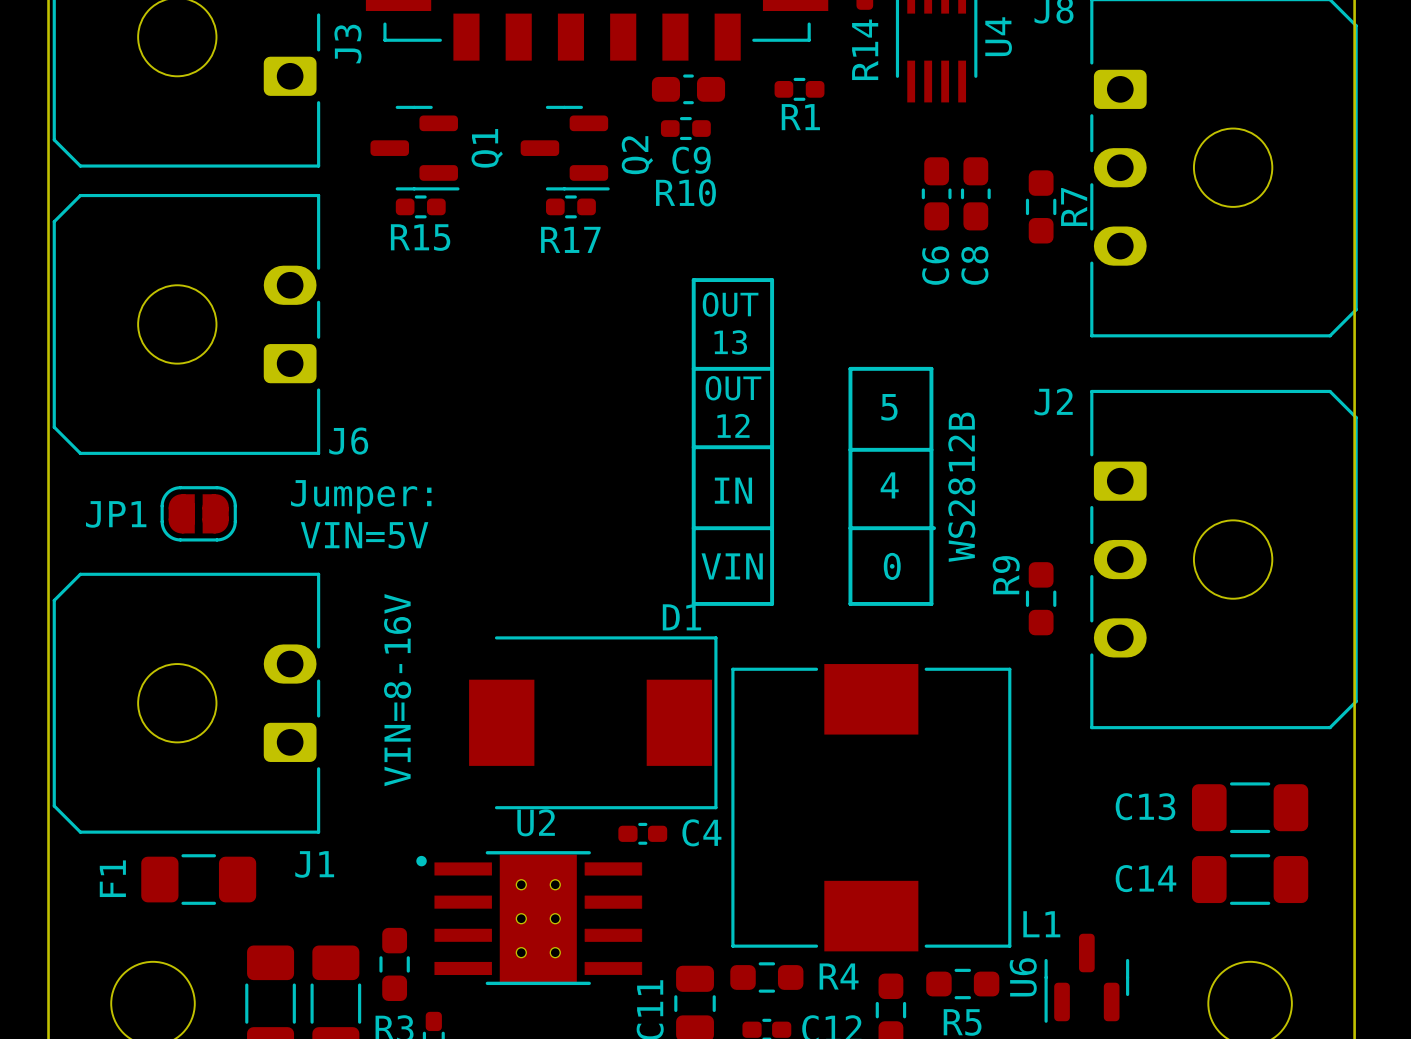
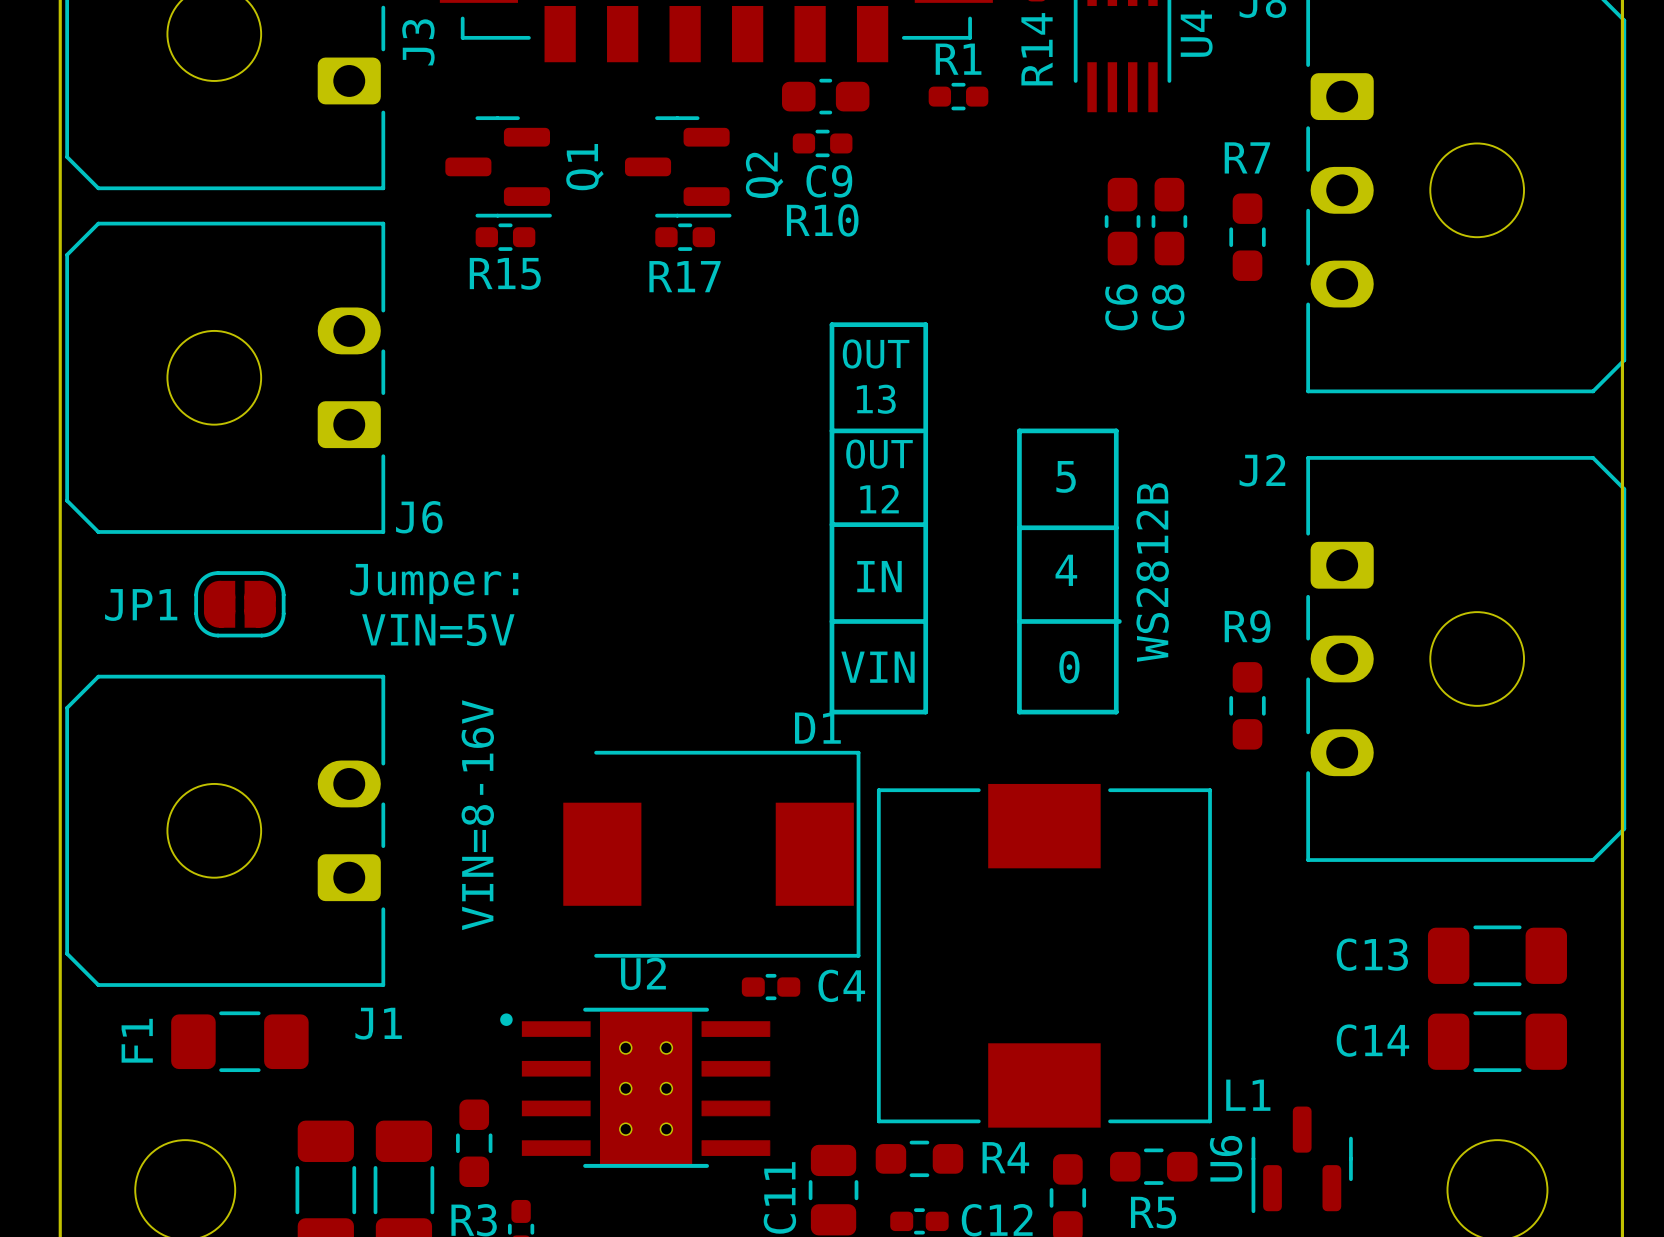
R1 name position: R1 (800, 117) -> R1 (958, 59)
R7 name rotation: 0° (1074, 207) -> 90° clockwise (1247, 157)
R7 name position: R7 (1074, 207) -> R7 (1247, 157)
R9 name rotation: 0° (1006, 575) -> 90° clockwise (1247, 626)

